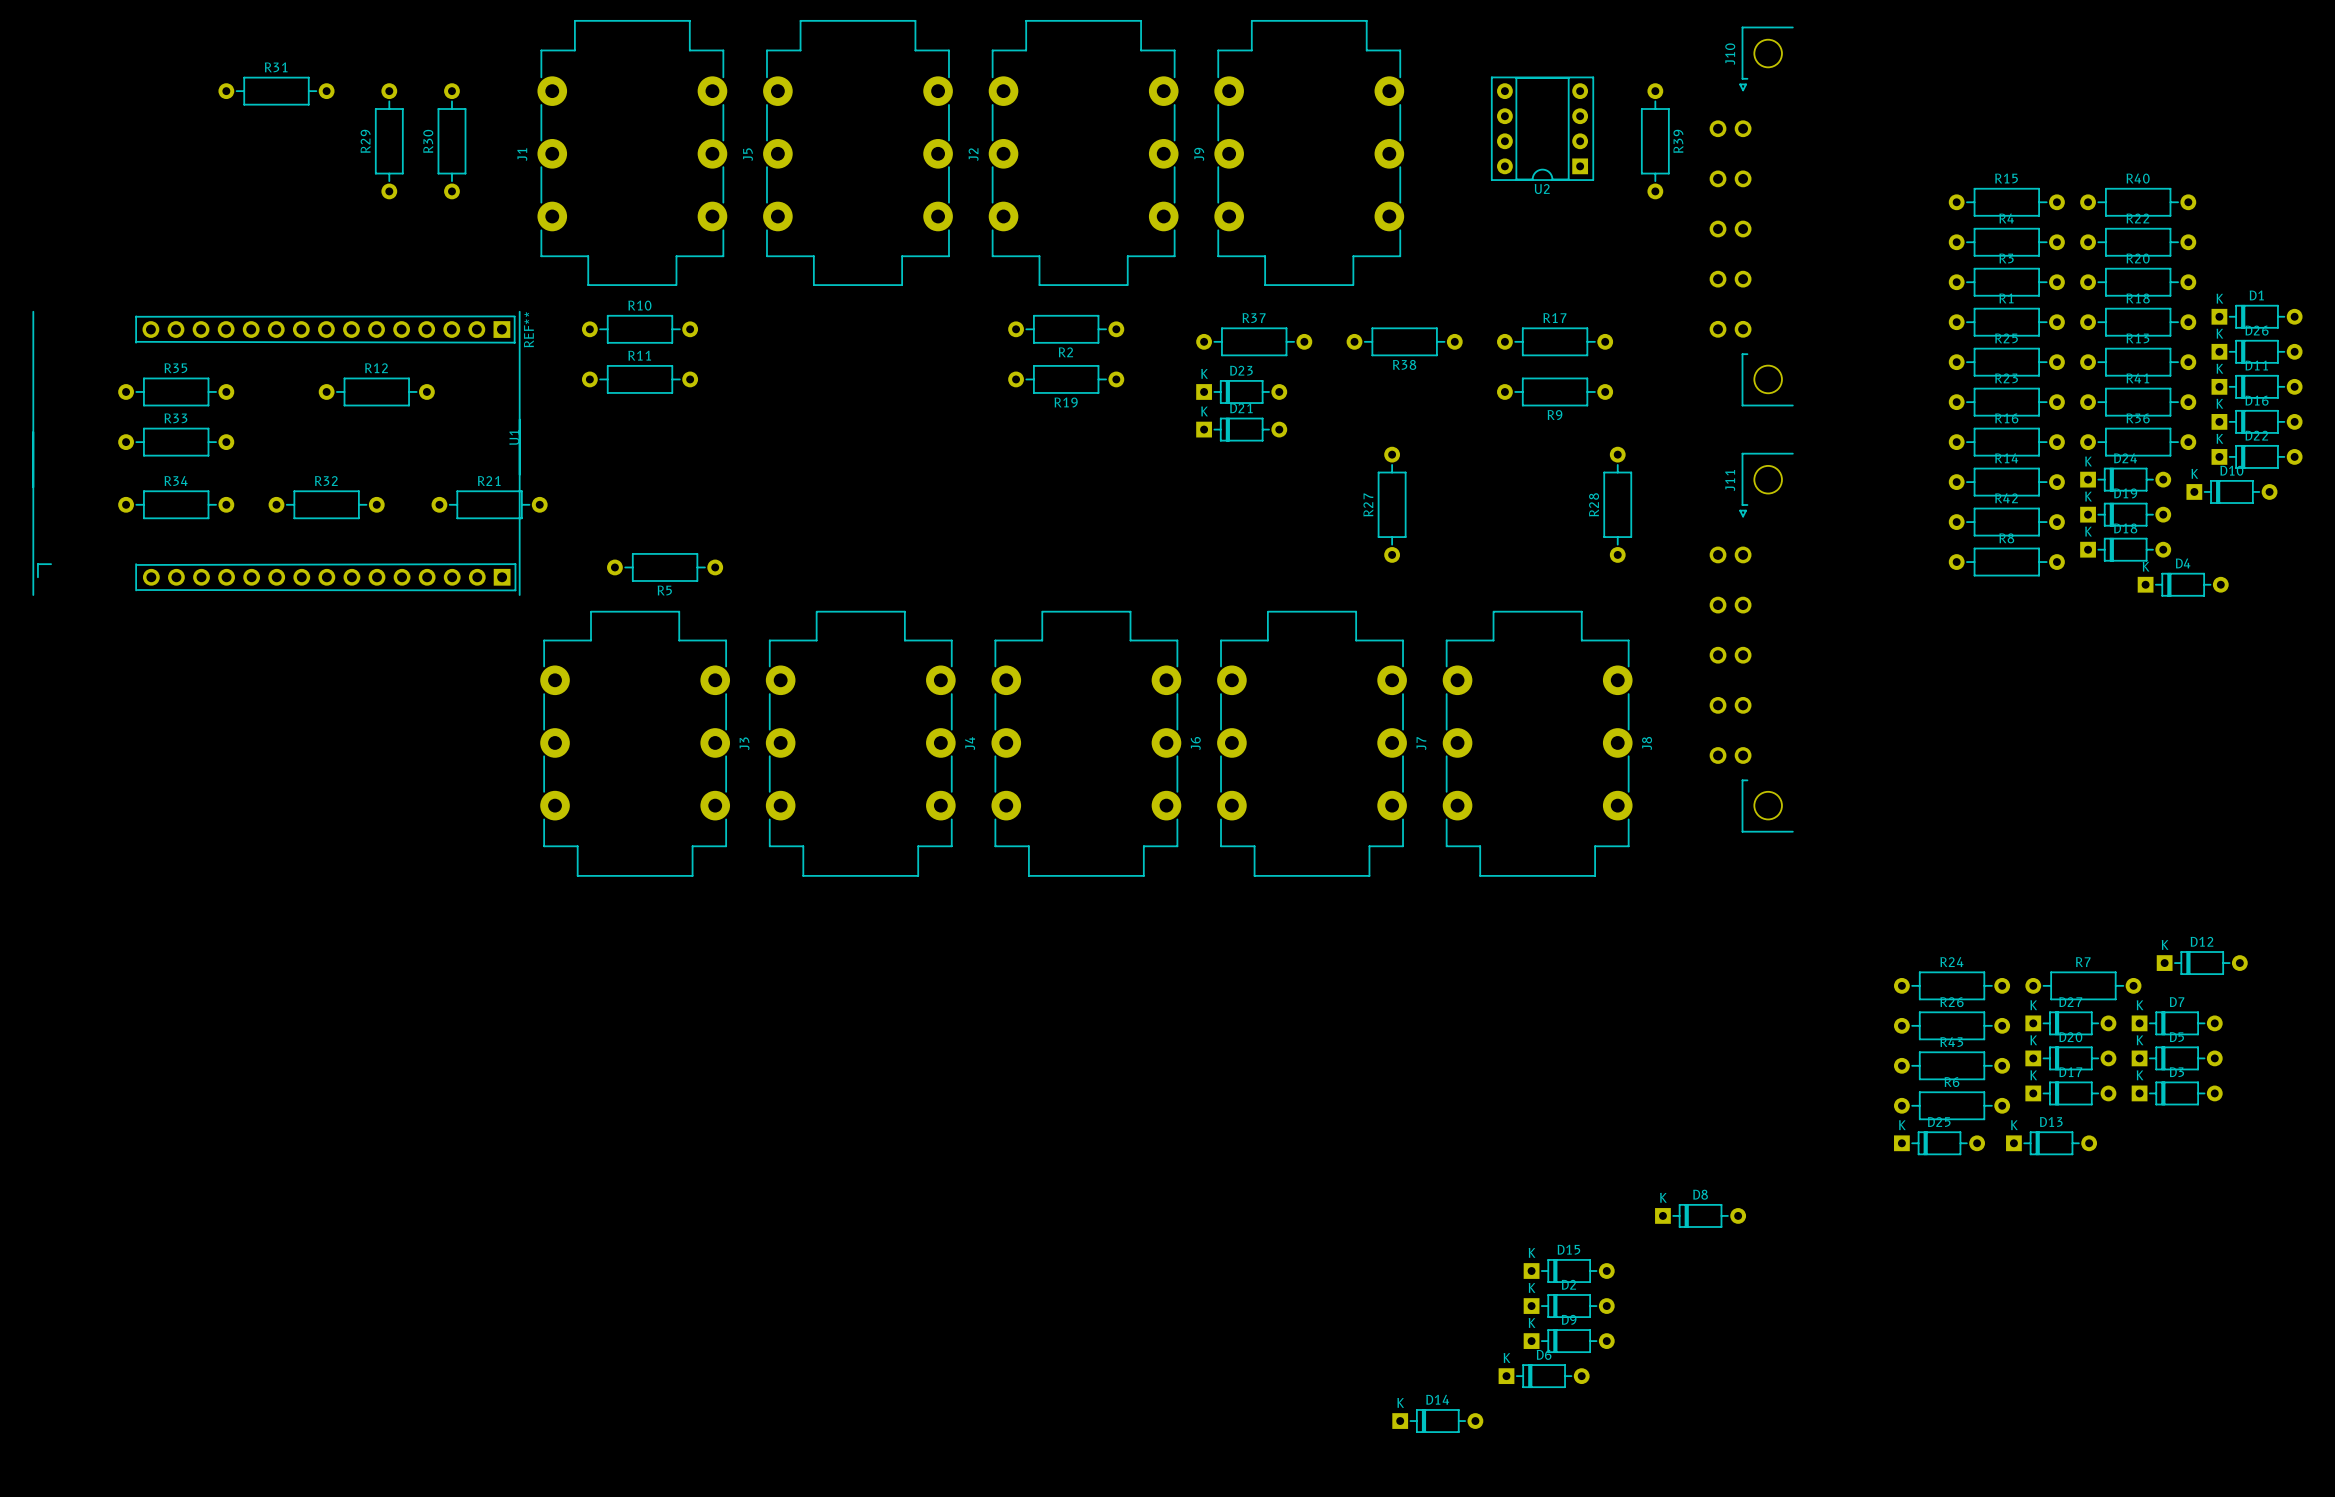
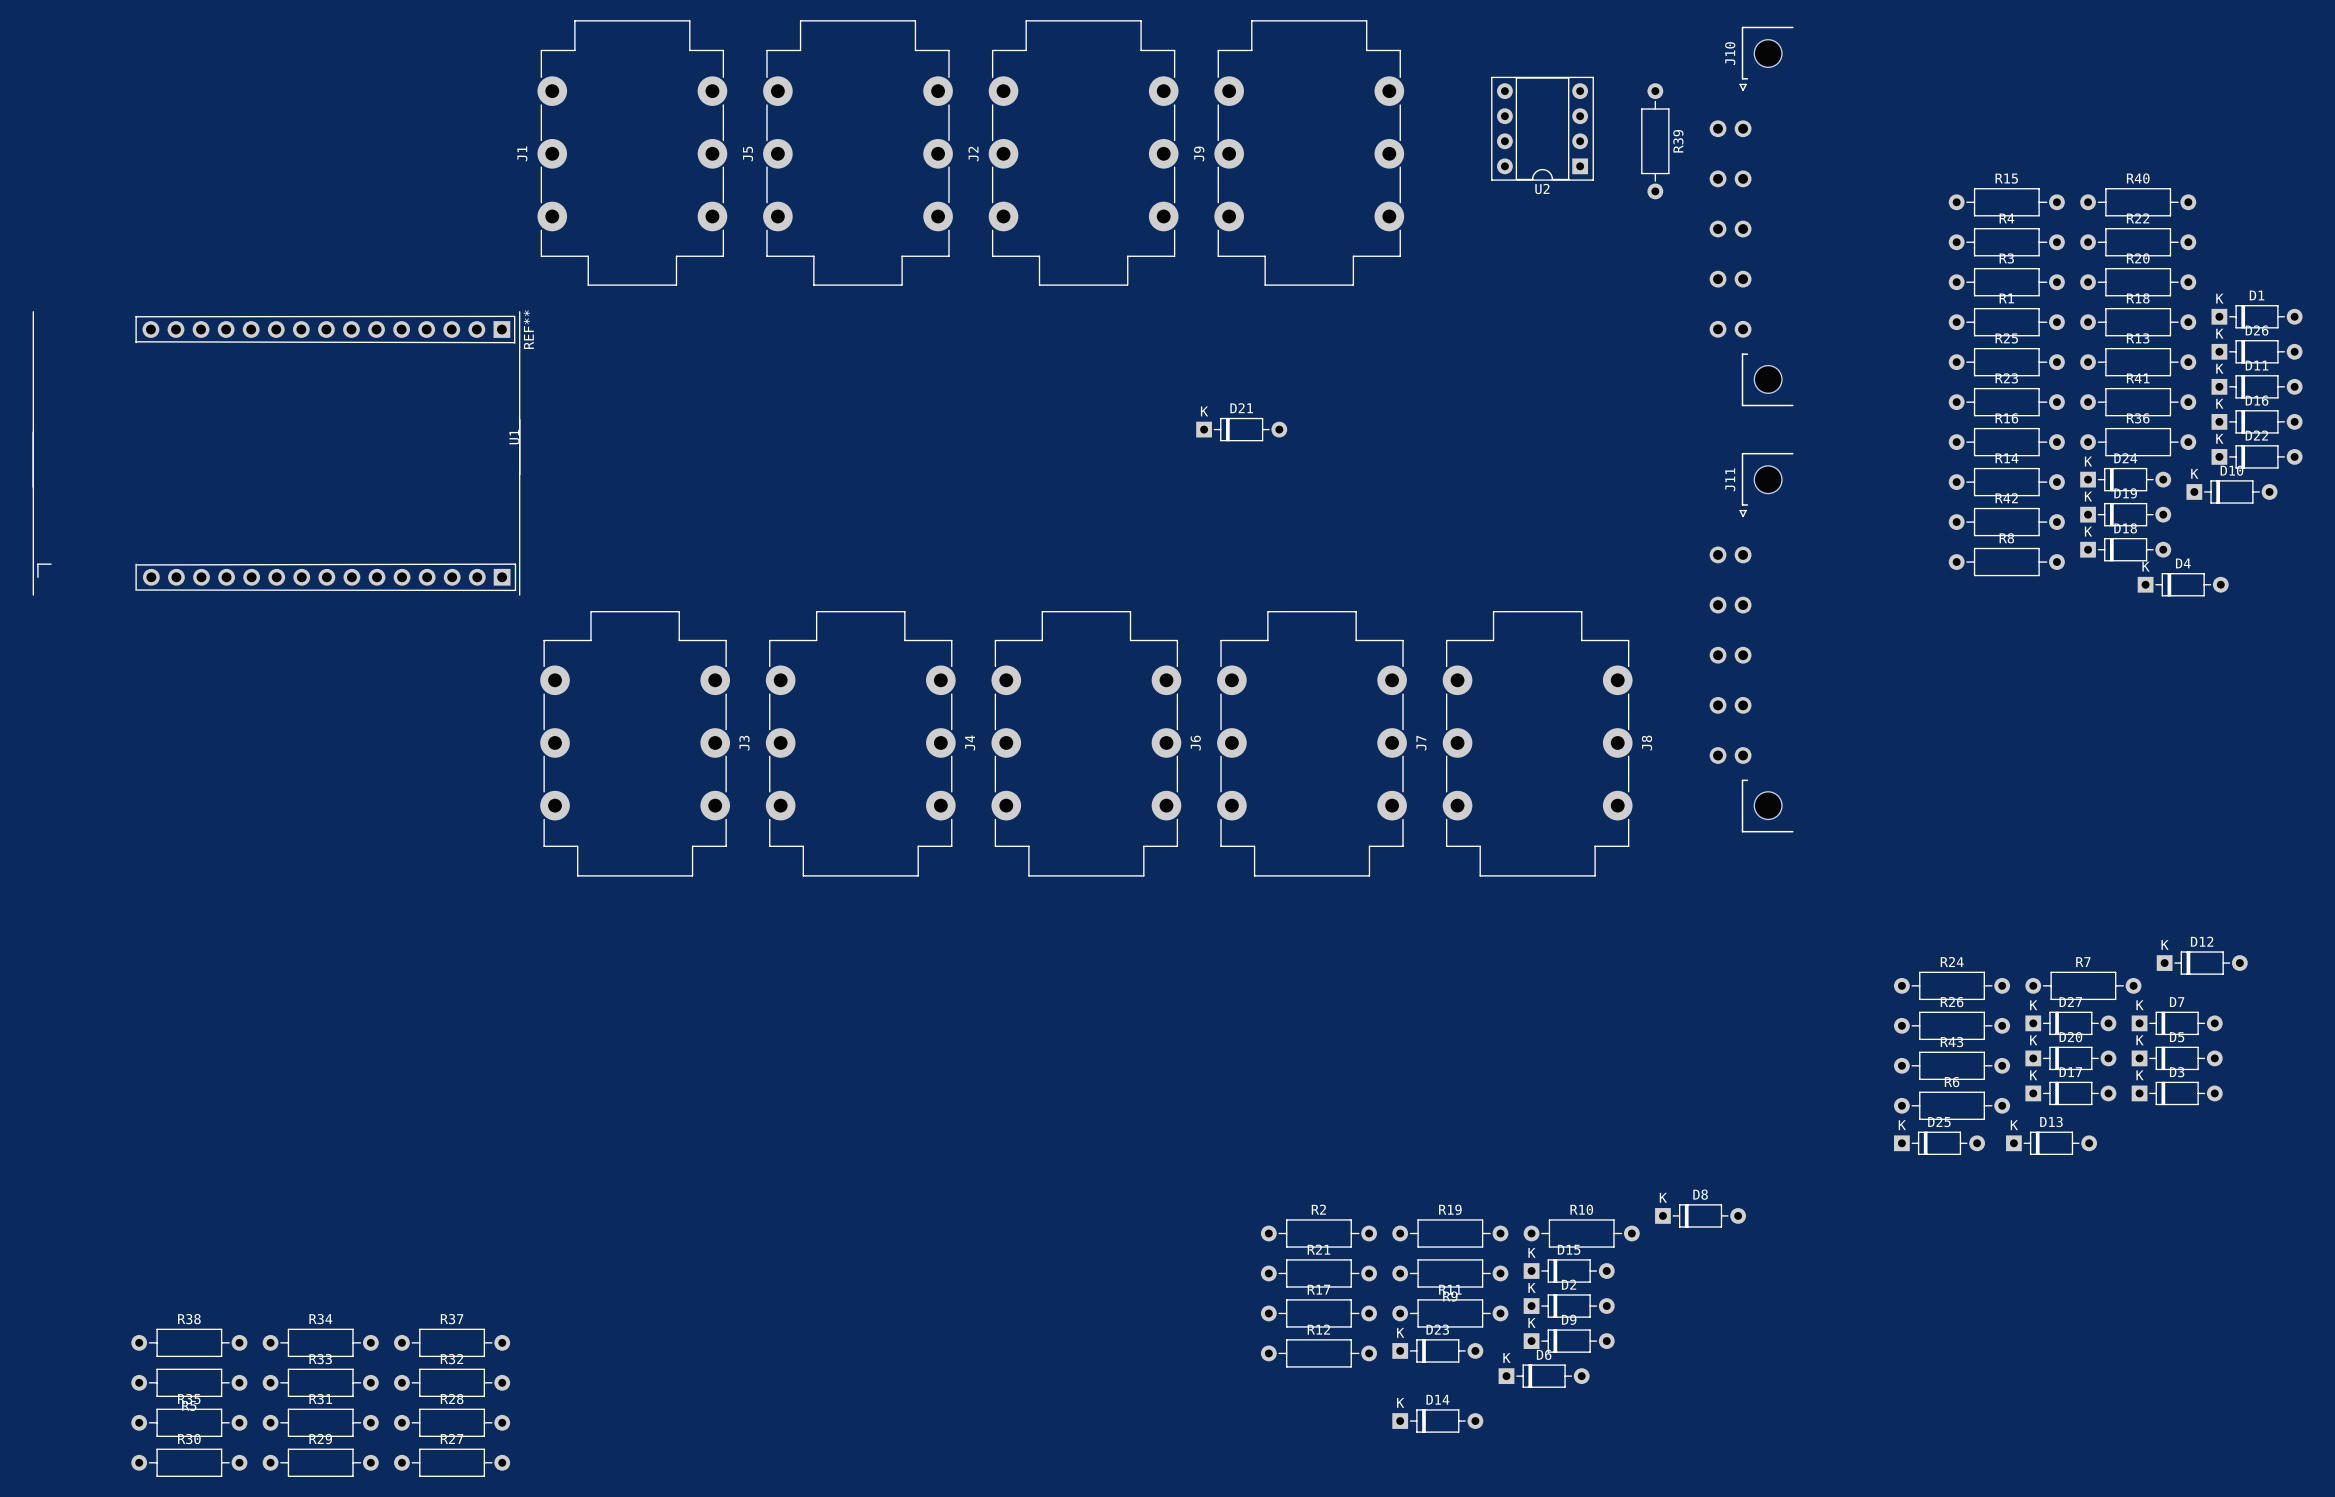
R31 position: (276, 91) -> (320, 1422)
R29 rotation: 0° (389, 141) -> 90° clockwise (320, 1462)
R29 position: (389, 141) -> (320, 1462)
R30 rotation: 0° (451, 141) -> 90° clockwise (189, 1462)
R30 position: (451, 141) -> (189, 1462)
R10 position: (640, 329) -> (1581, 1233)
R2 position: (1066, 329) -> (1318, 1233)
R37 position: (1254, 341) -> (452, 1342)
R38 position: (1404, 341) -> (189, 1342)
R17 position: (1555, 341) -> (1318, 1313)
R2 name position: R2 (1065, 352) -> R2 (1318, 1209)
R38 name position: R38 (1404, 364) -> R38 (189, 1319)
R11 position: (640, 379) -> (1450, 1313)
R19 position: (1066, 379) -> (1450, 1233)
R35 position: (176, 391) -> (189, 1422)
R12 position: (376, 391) -> (1318, 1353)
D23 position: (1241, 391) -> (1437, 1350)
R9 position: (1555, 391) -> (1450, 1273)
R19 name position: R19 (1066, 402) -> R19 (1450, 1209)
R33 position: (176, 442) -> (320, 1382)
R34 position: (176, 504) -> (320, 1342)
R32 position: (326, 504) -> (452, 1382)
R21 position: (489, 504) -> (1318, 1273)
R27 rotation: 0° (1392, 504) -> 90° clockwise (452, 1462)
R27 position: (1392, 504) -> (452, 1462)
R28 rotation: 0° (1617, 504) -> 90° clockwise (452, 1422)
R28 position: (1617, 504) -> (452, 1422)
R5 position: (665, 567) -> (189, 1382)

